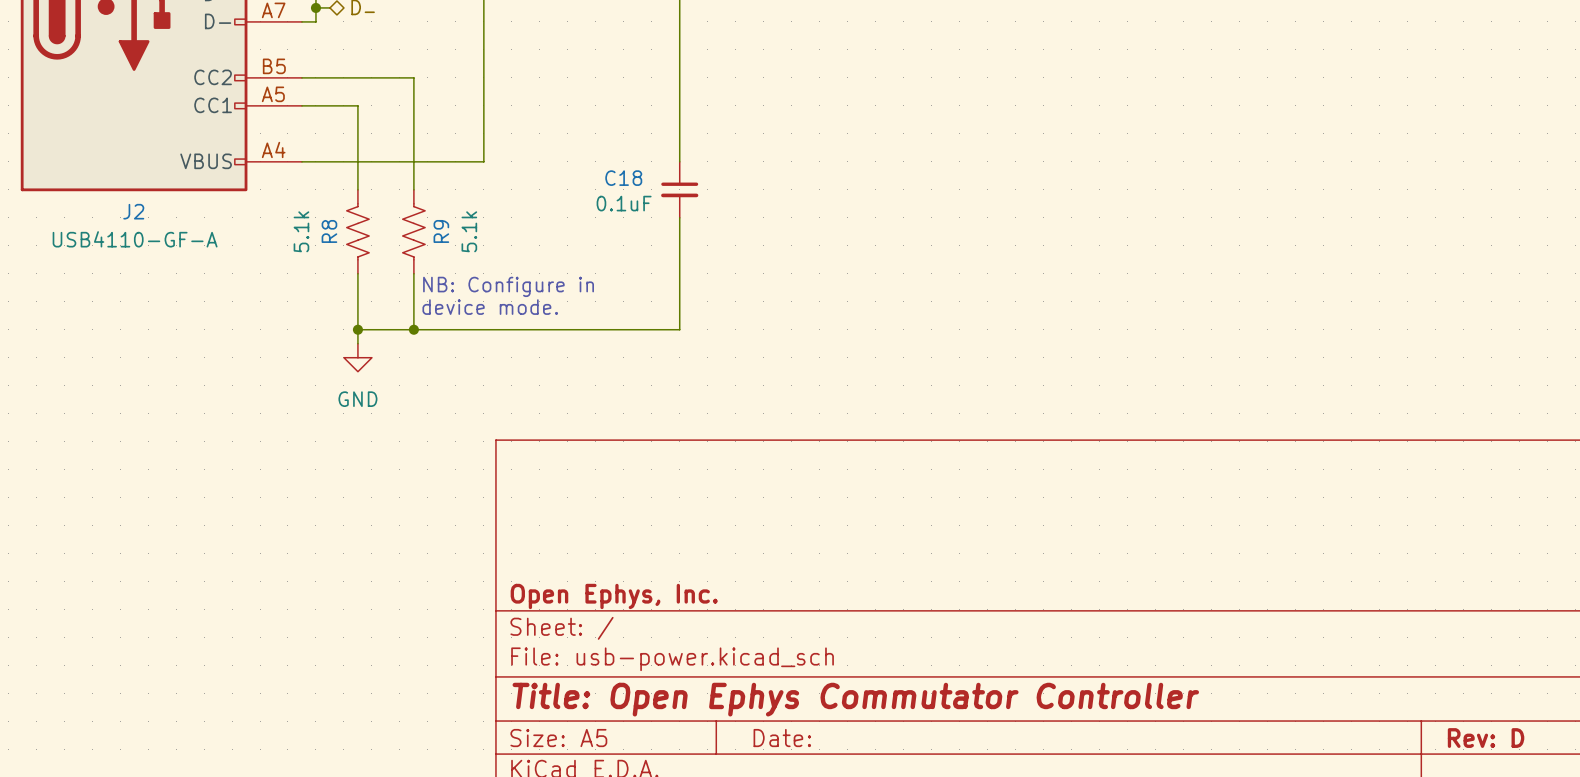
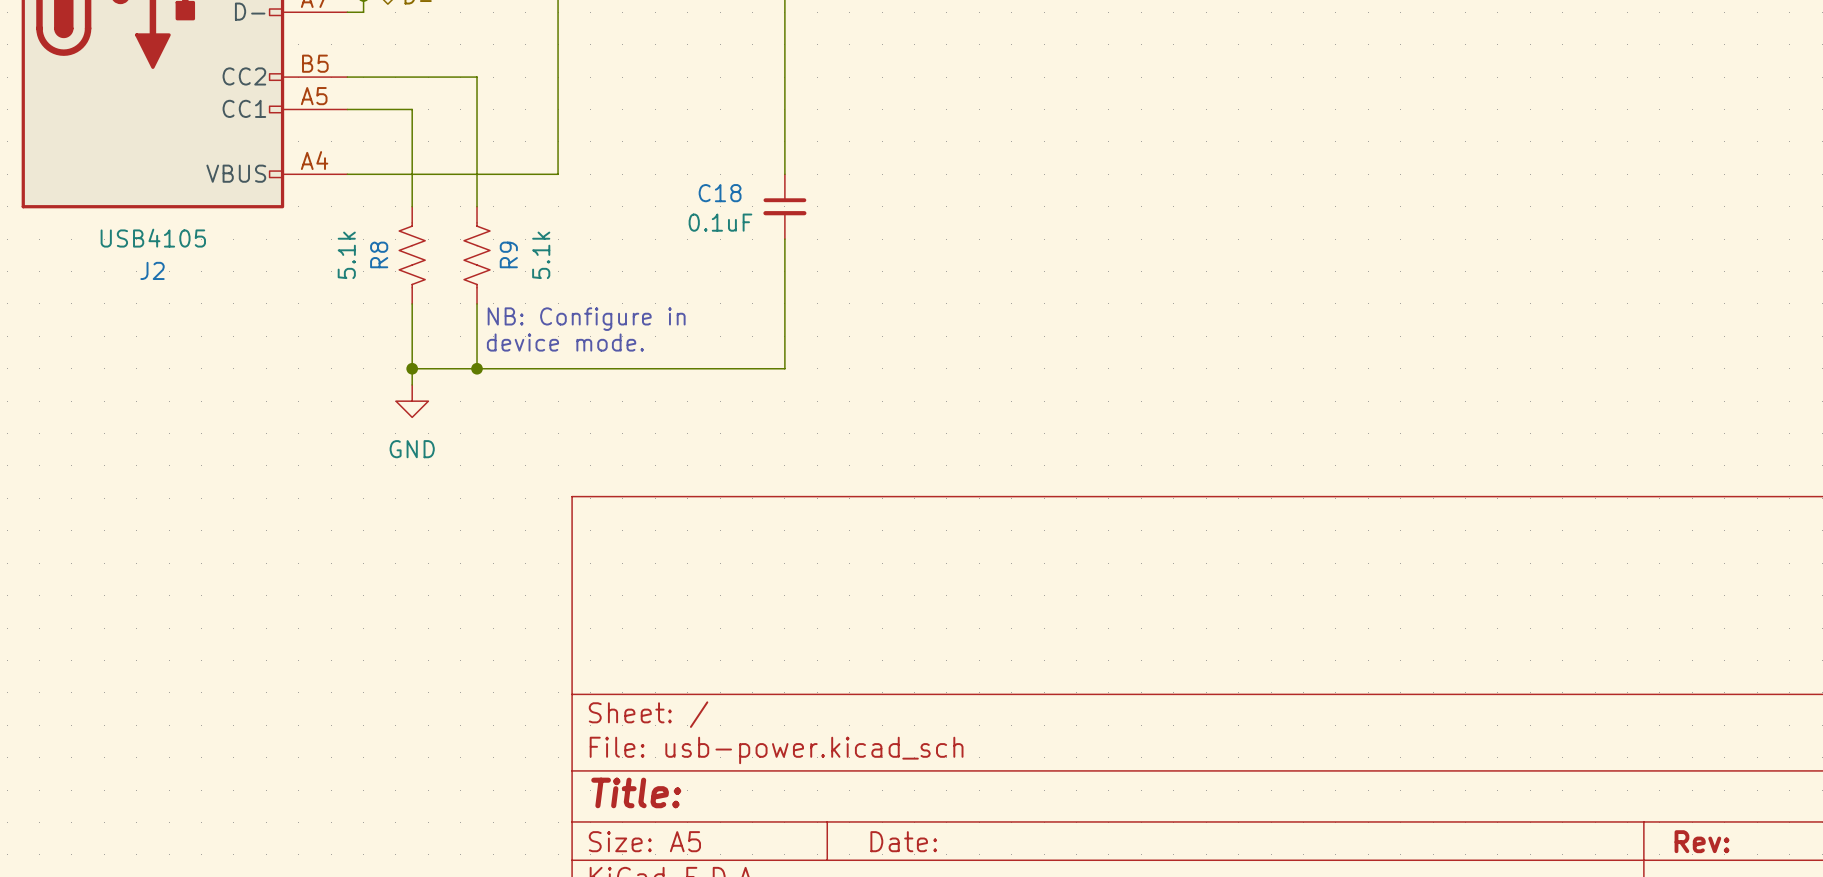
J2 name position: J2 (133, 211) -> J2 (152, 270)
J2 value: USB4110-GF-A (135, 239) -> USB4105 (153, 238)
title block: Open Ephys, Inc. (614, 596) -> none
title block: Title: Open Ephys Commutator Controller (855, 699) -> Title: (636, 792)
title block: Rev: D (1486, 738) -> Rev: (1701, 841)

